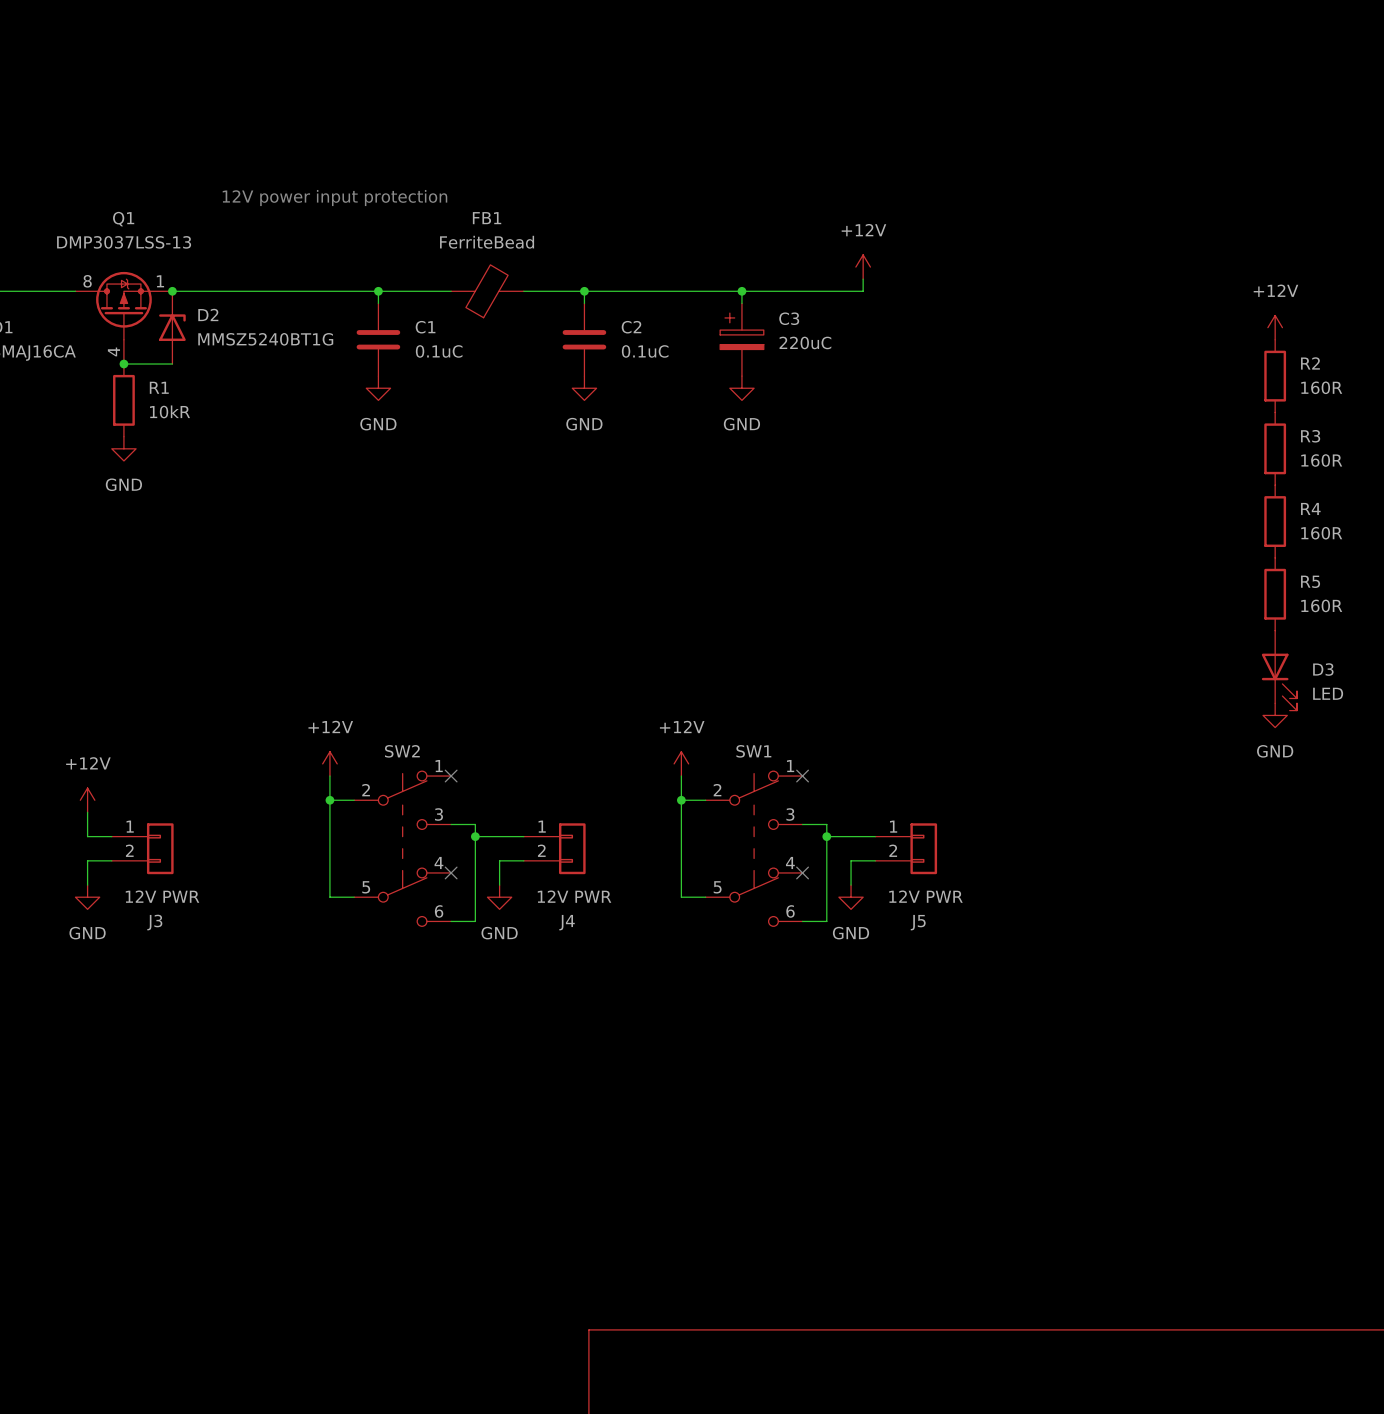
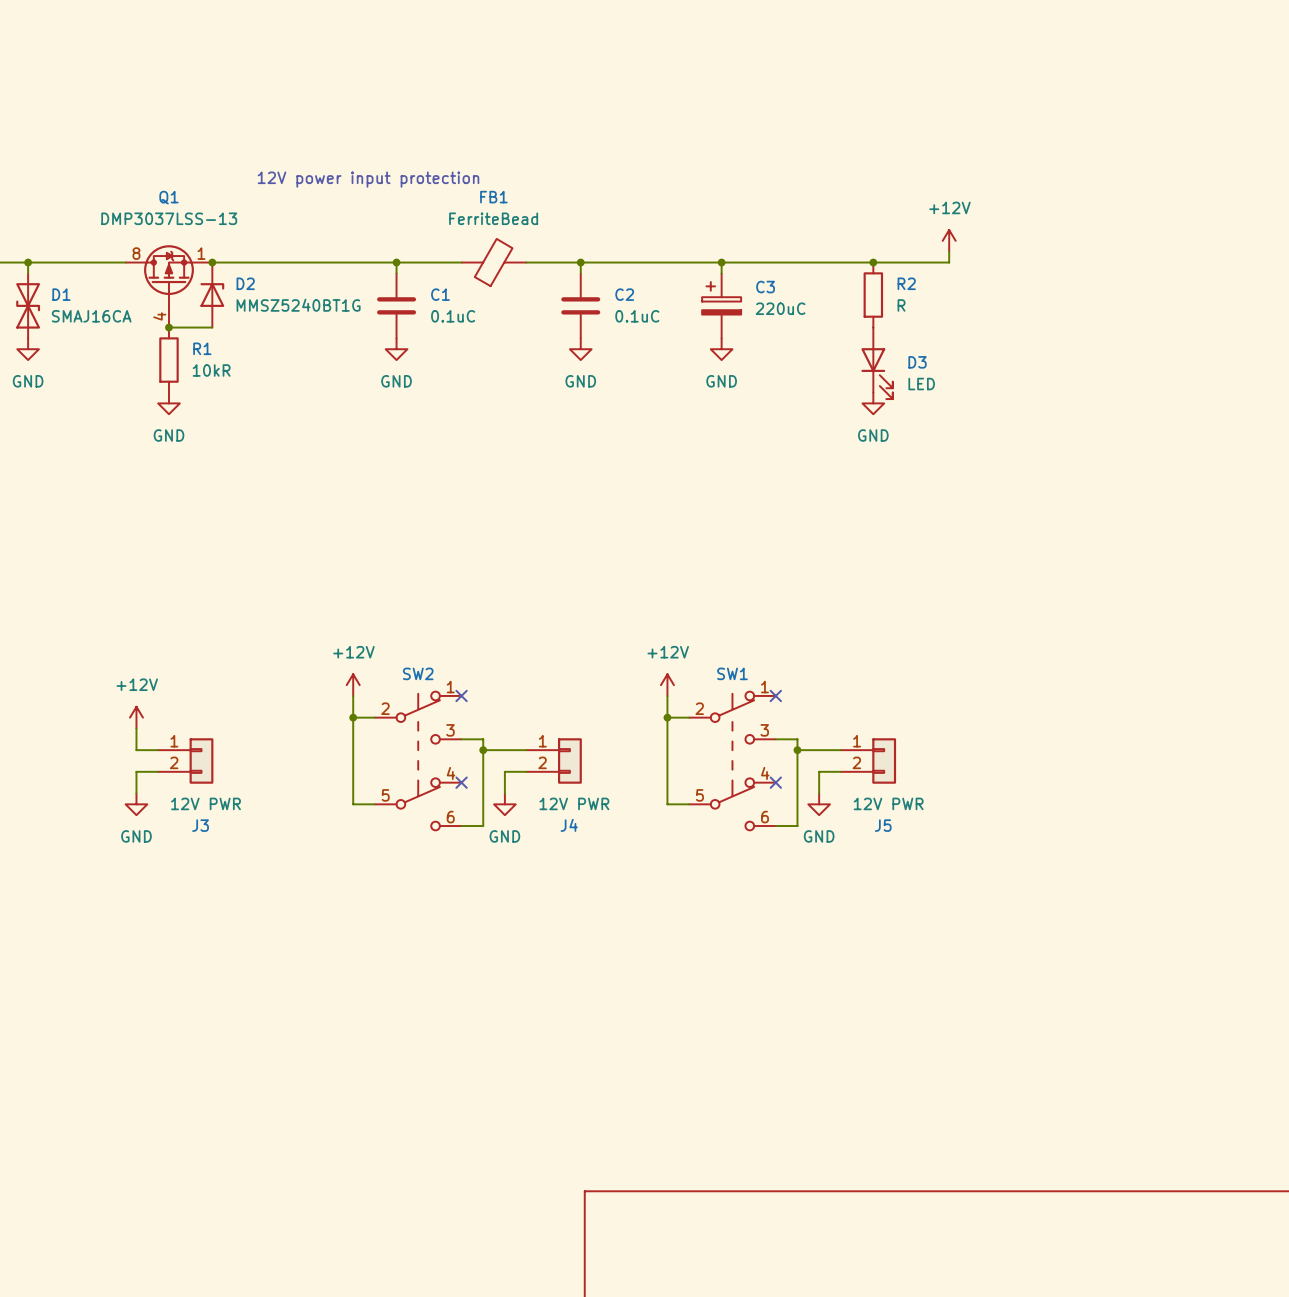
power symbol position: +12V (863, 267) -> +12V (949, 240)
wire: (863, 279) (863, 291) -> (949, 251) (949, 262) (829, 262)
junction: none -> (873, 262)
power symbol: +12V (1275, 327) -> none
R2 position: (1275, 376) -> (873, 295)
R2 value: 160R (1321, 387) -> R (901, 305)
power symbol: none -> GND (873, 403)
R3: 160R (1275, 448) -> none
R4: 160R (1275, 521) -> none
R5: 160R (1275, 594) -> none
D3 position: (1279, 670) -> (877, 363)
power symbol: GND (1275, 715) -> none

